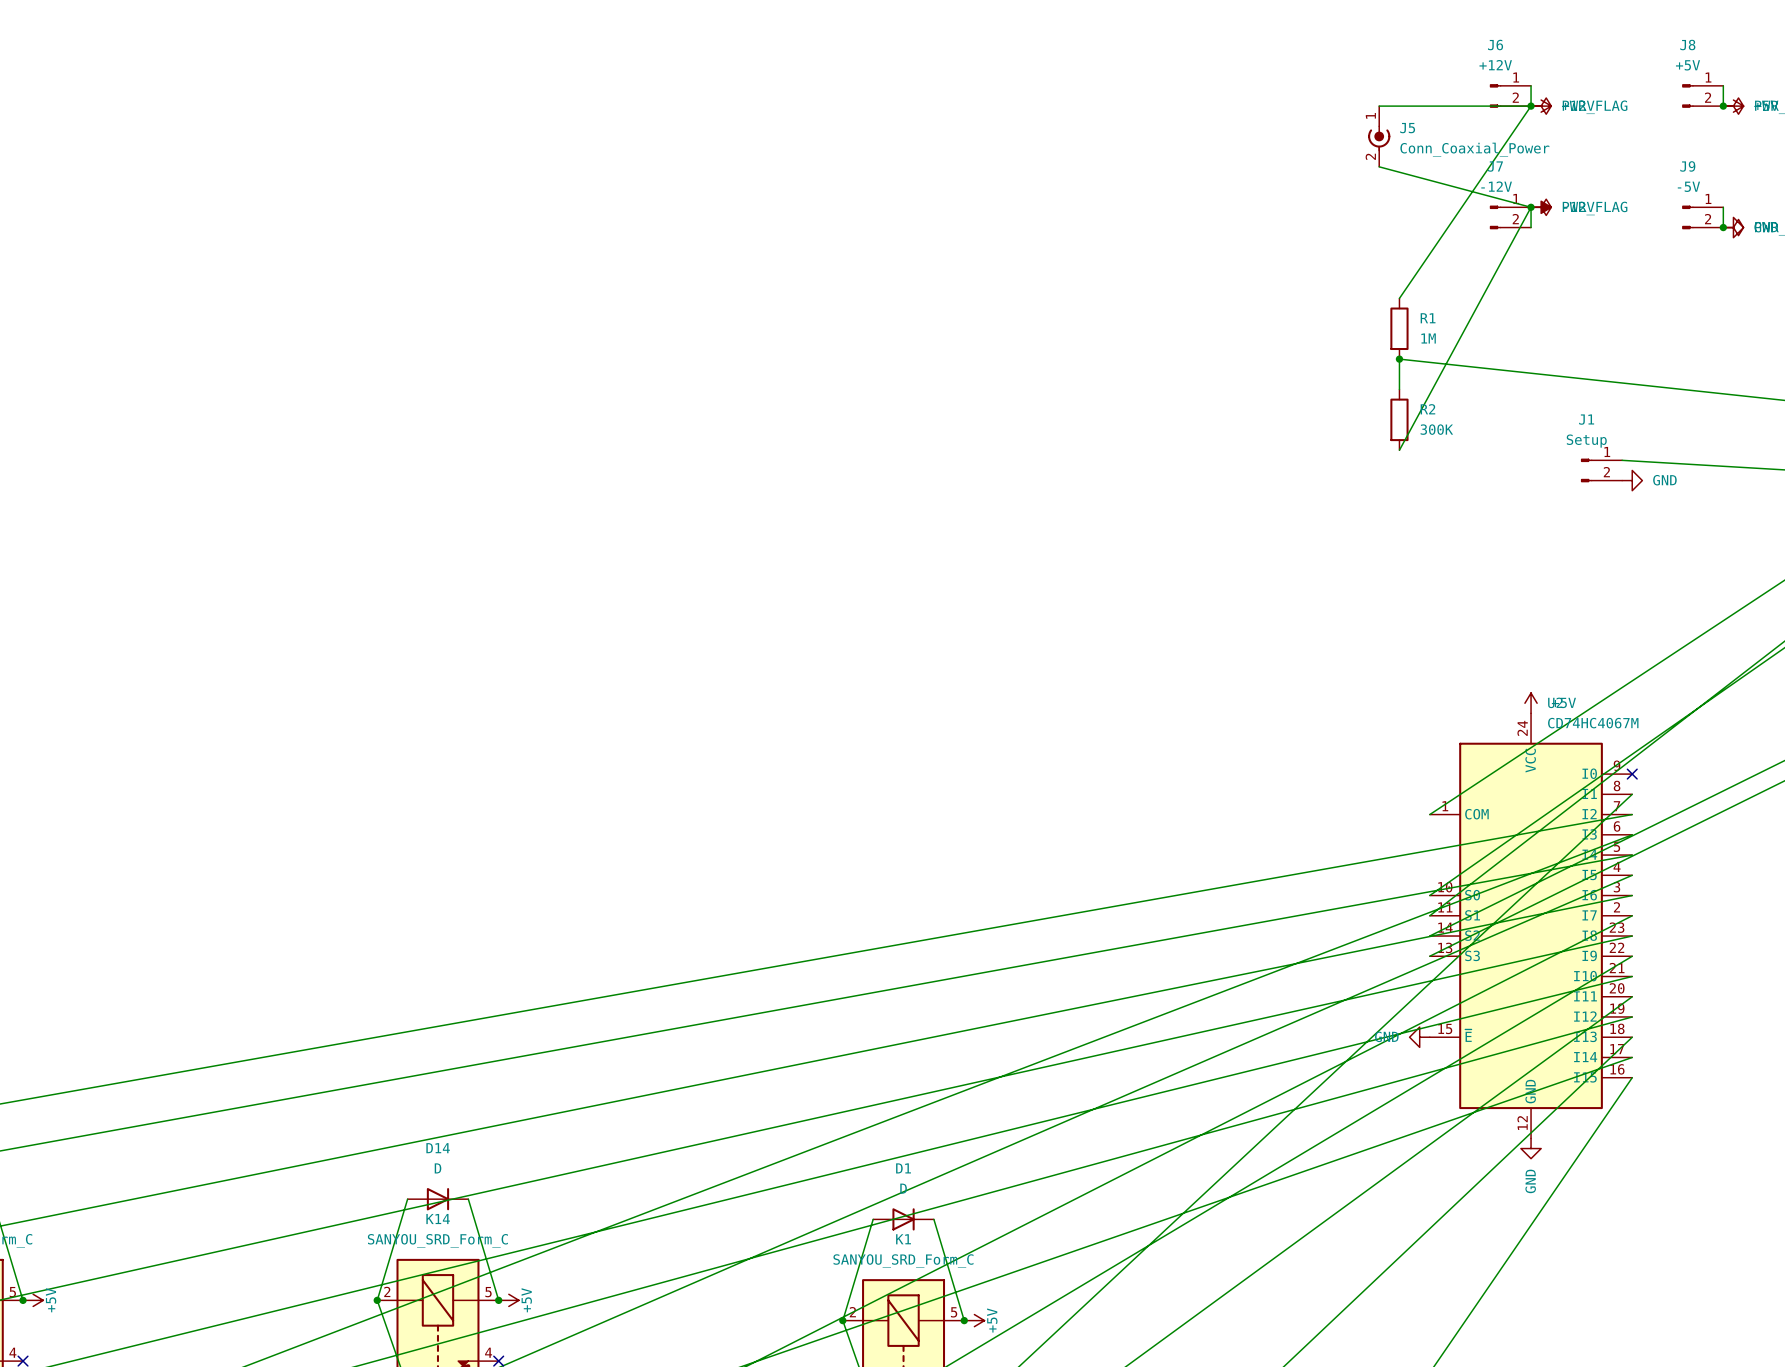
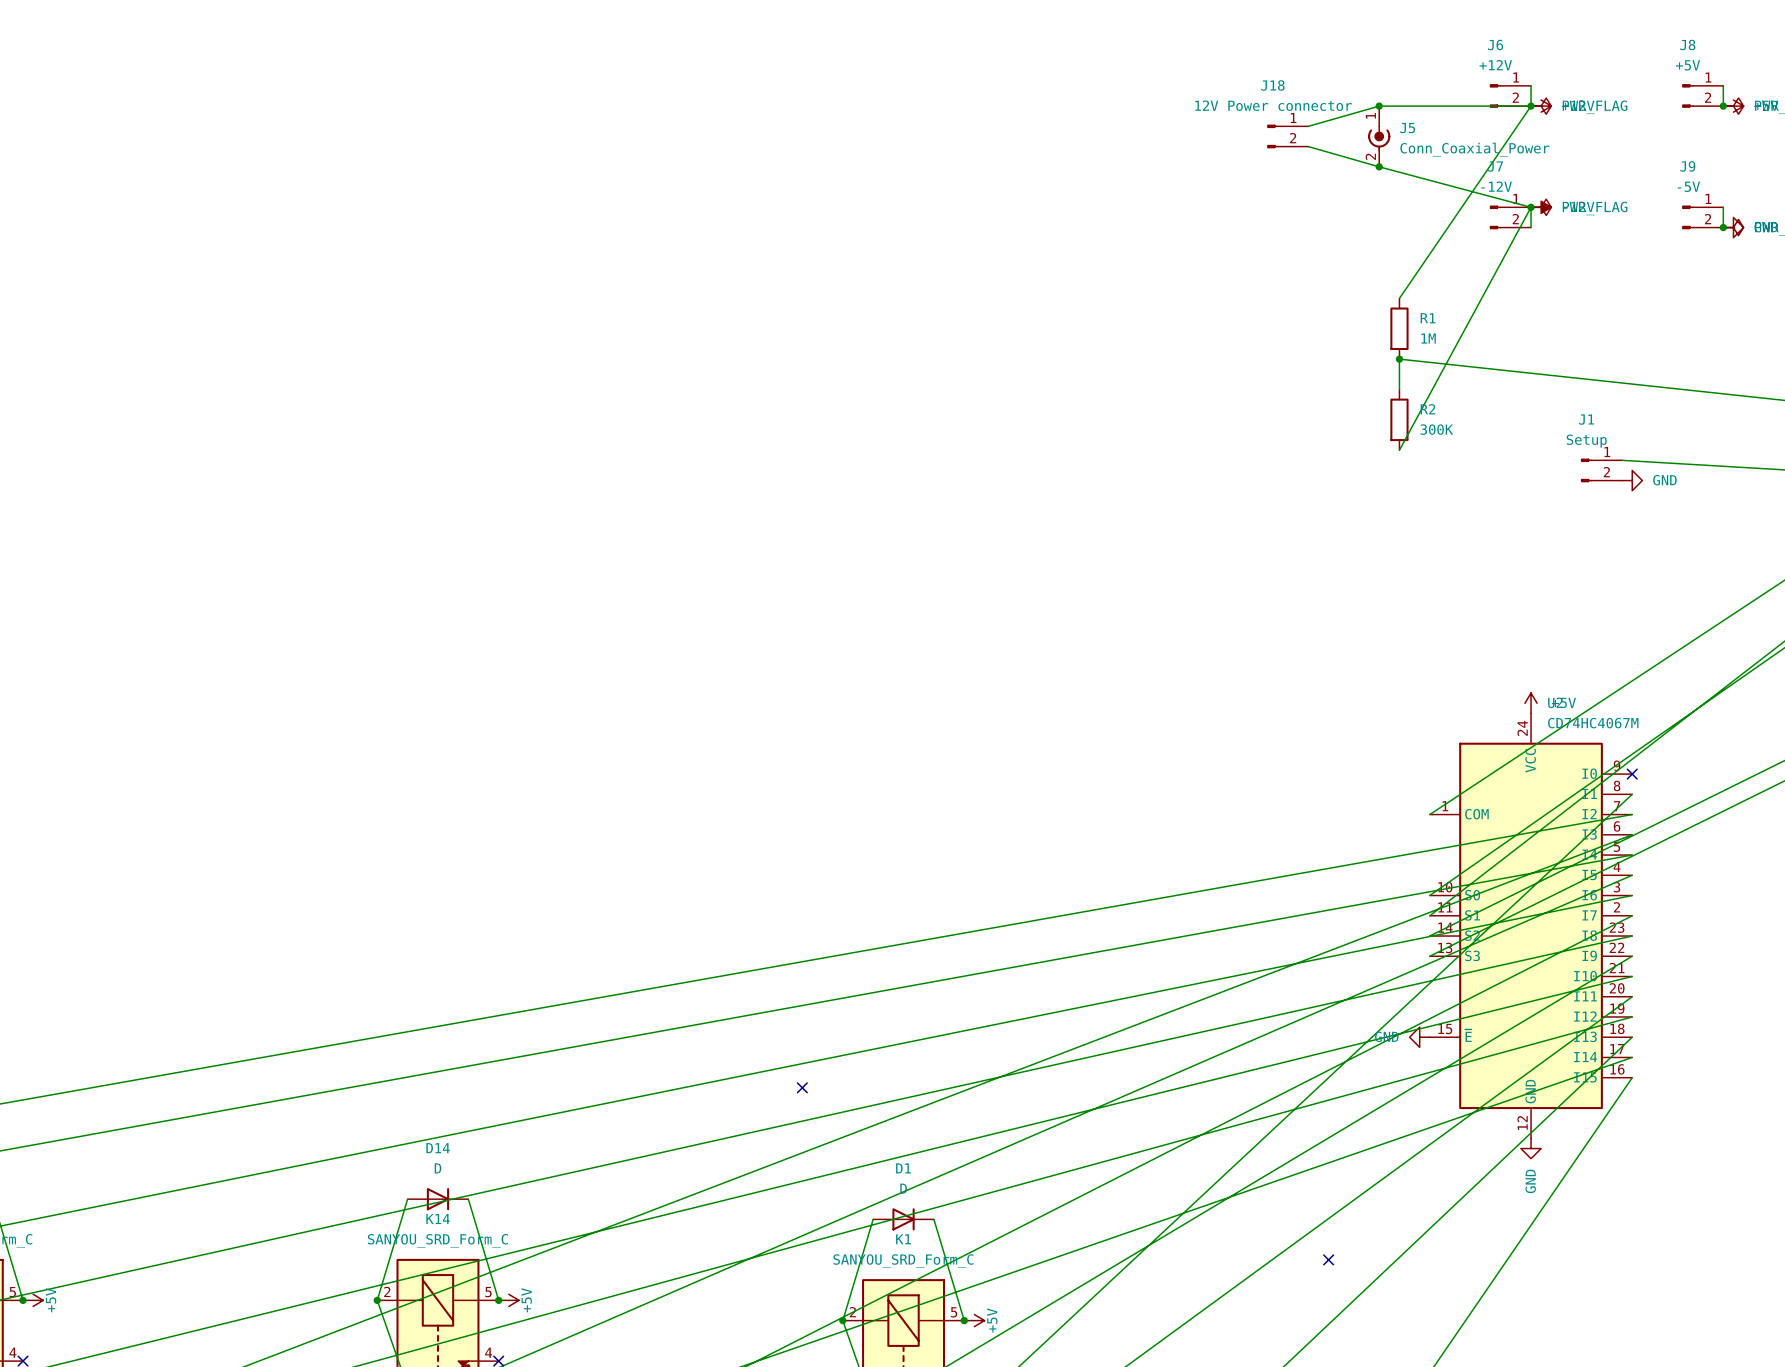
wire: none -> (1379, 106) (1308, 126)
junction: none -> (1379, 106)
J18: none -> 12V Power connector (1287, 136)
wire: none -> (1308, 146) (1379, 166)
junction: none -> (1379, 166)
no-connect mark: none -> (802, 1087)
no-connect mark: none -> (1328, 1259)

